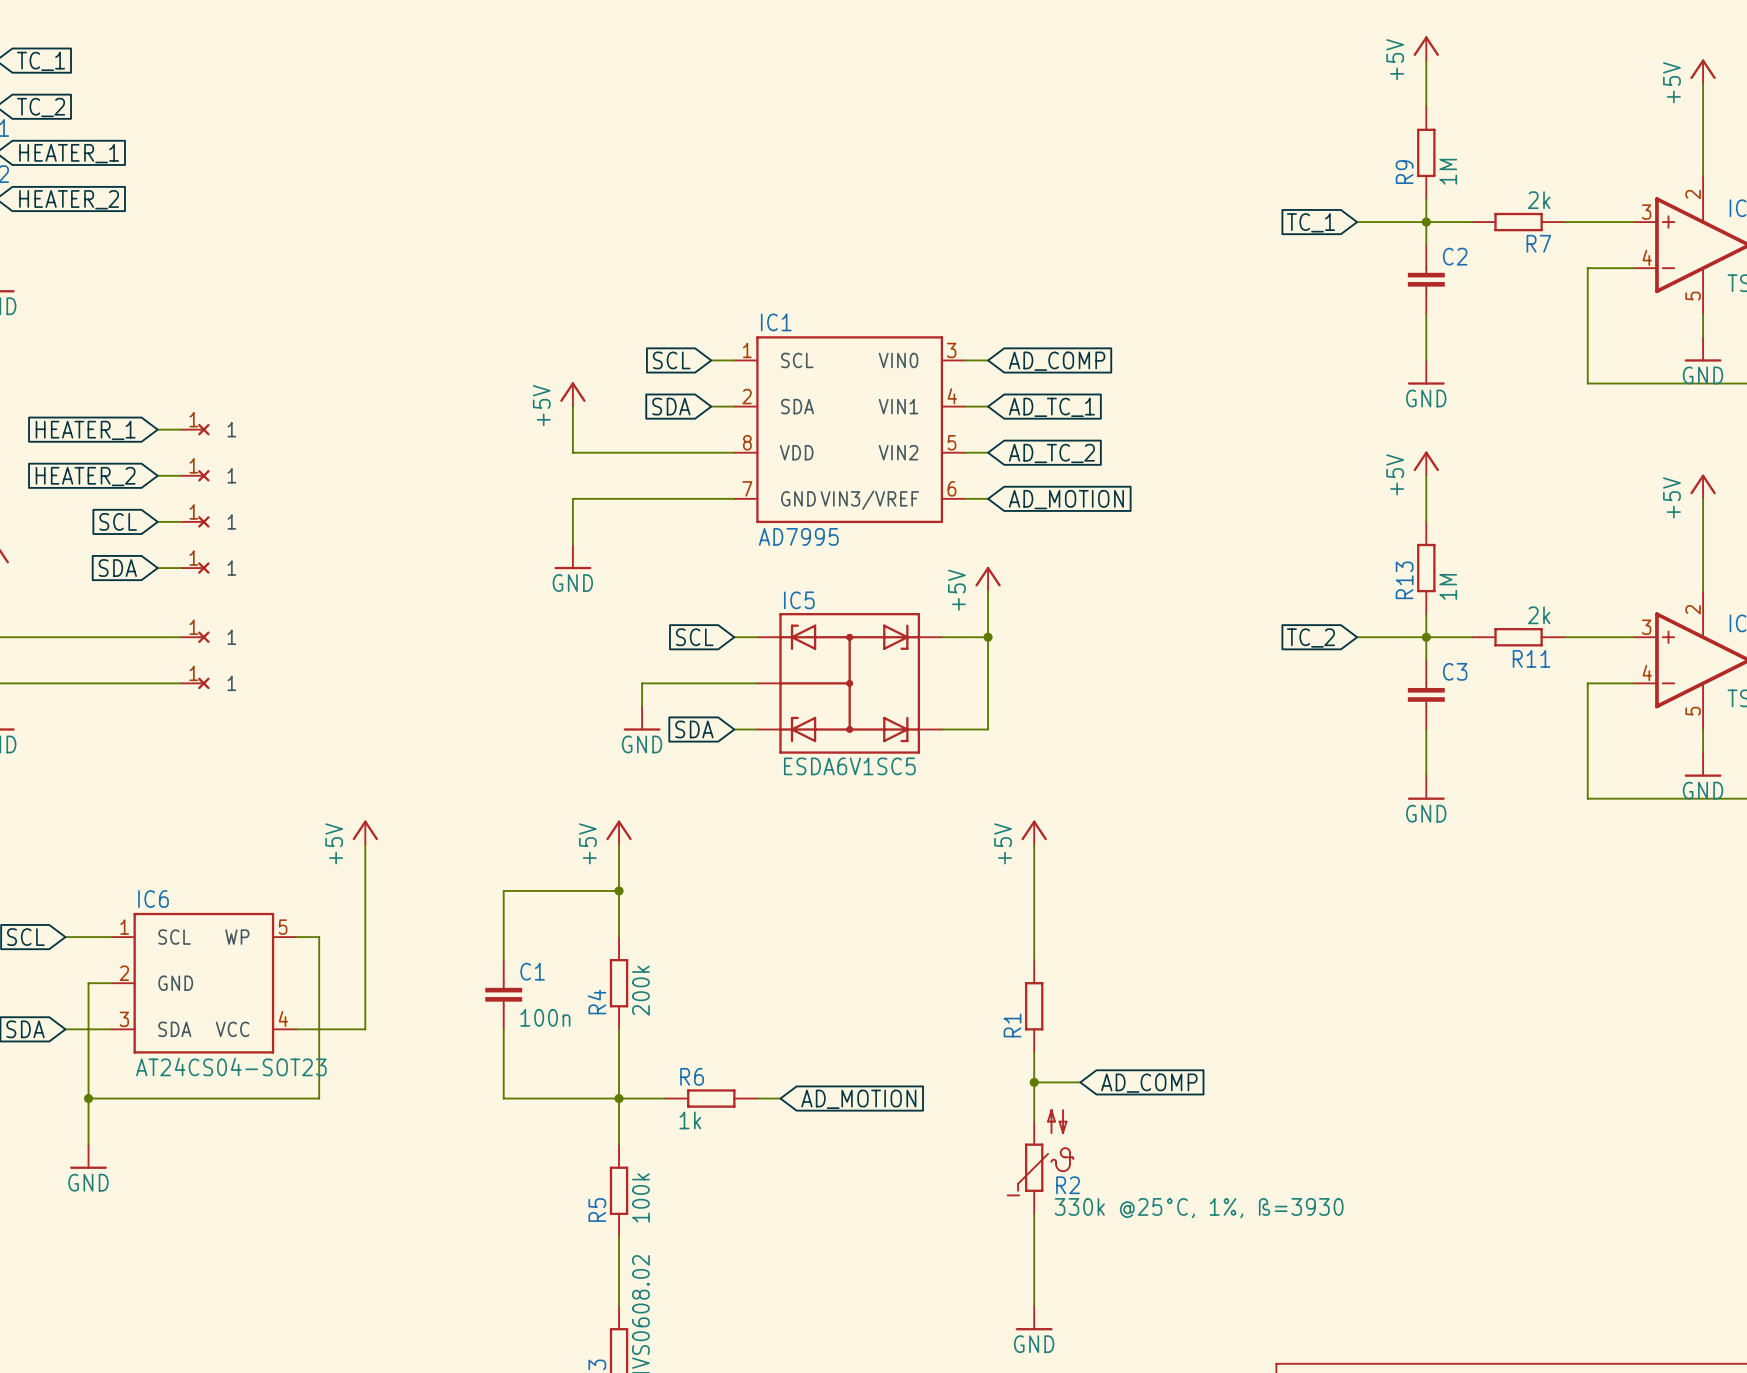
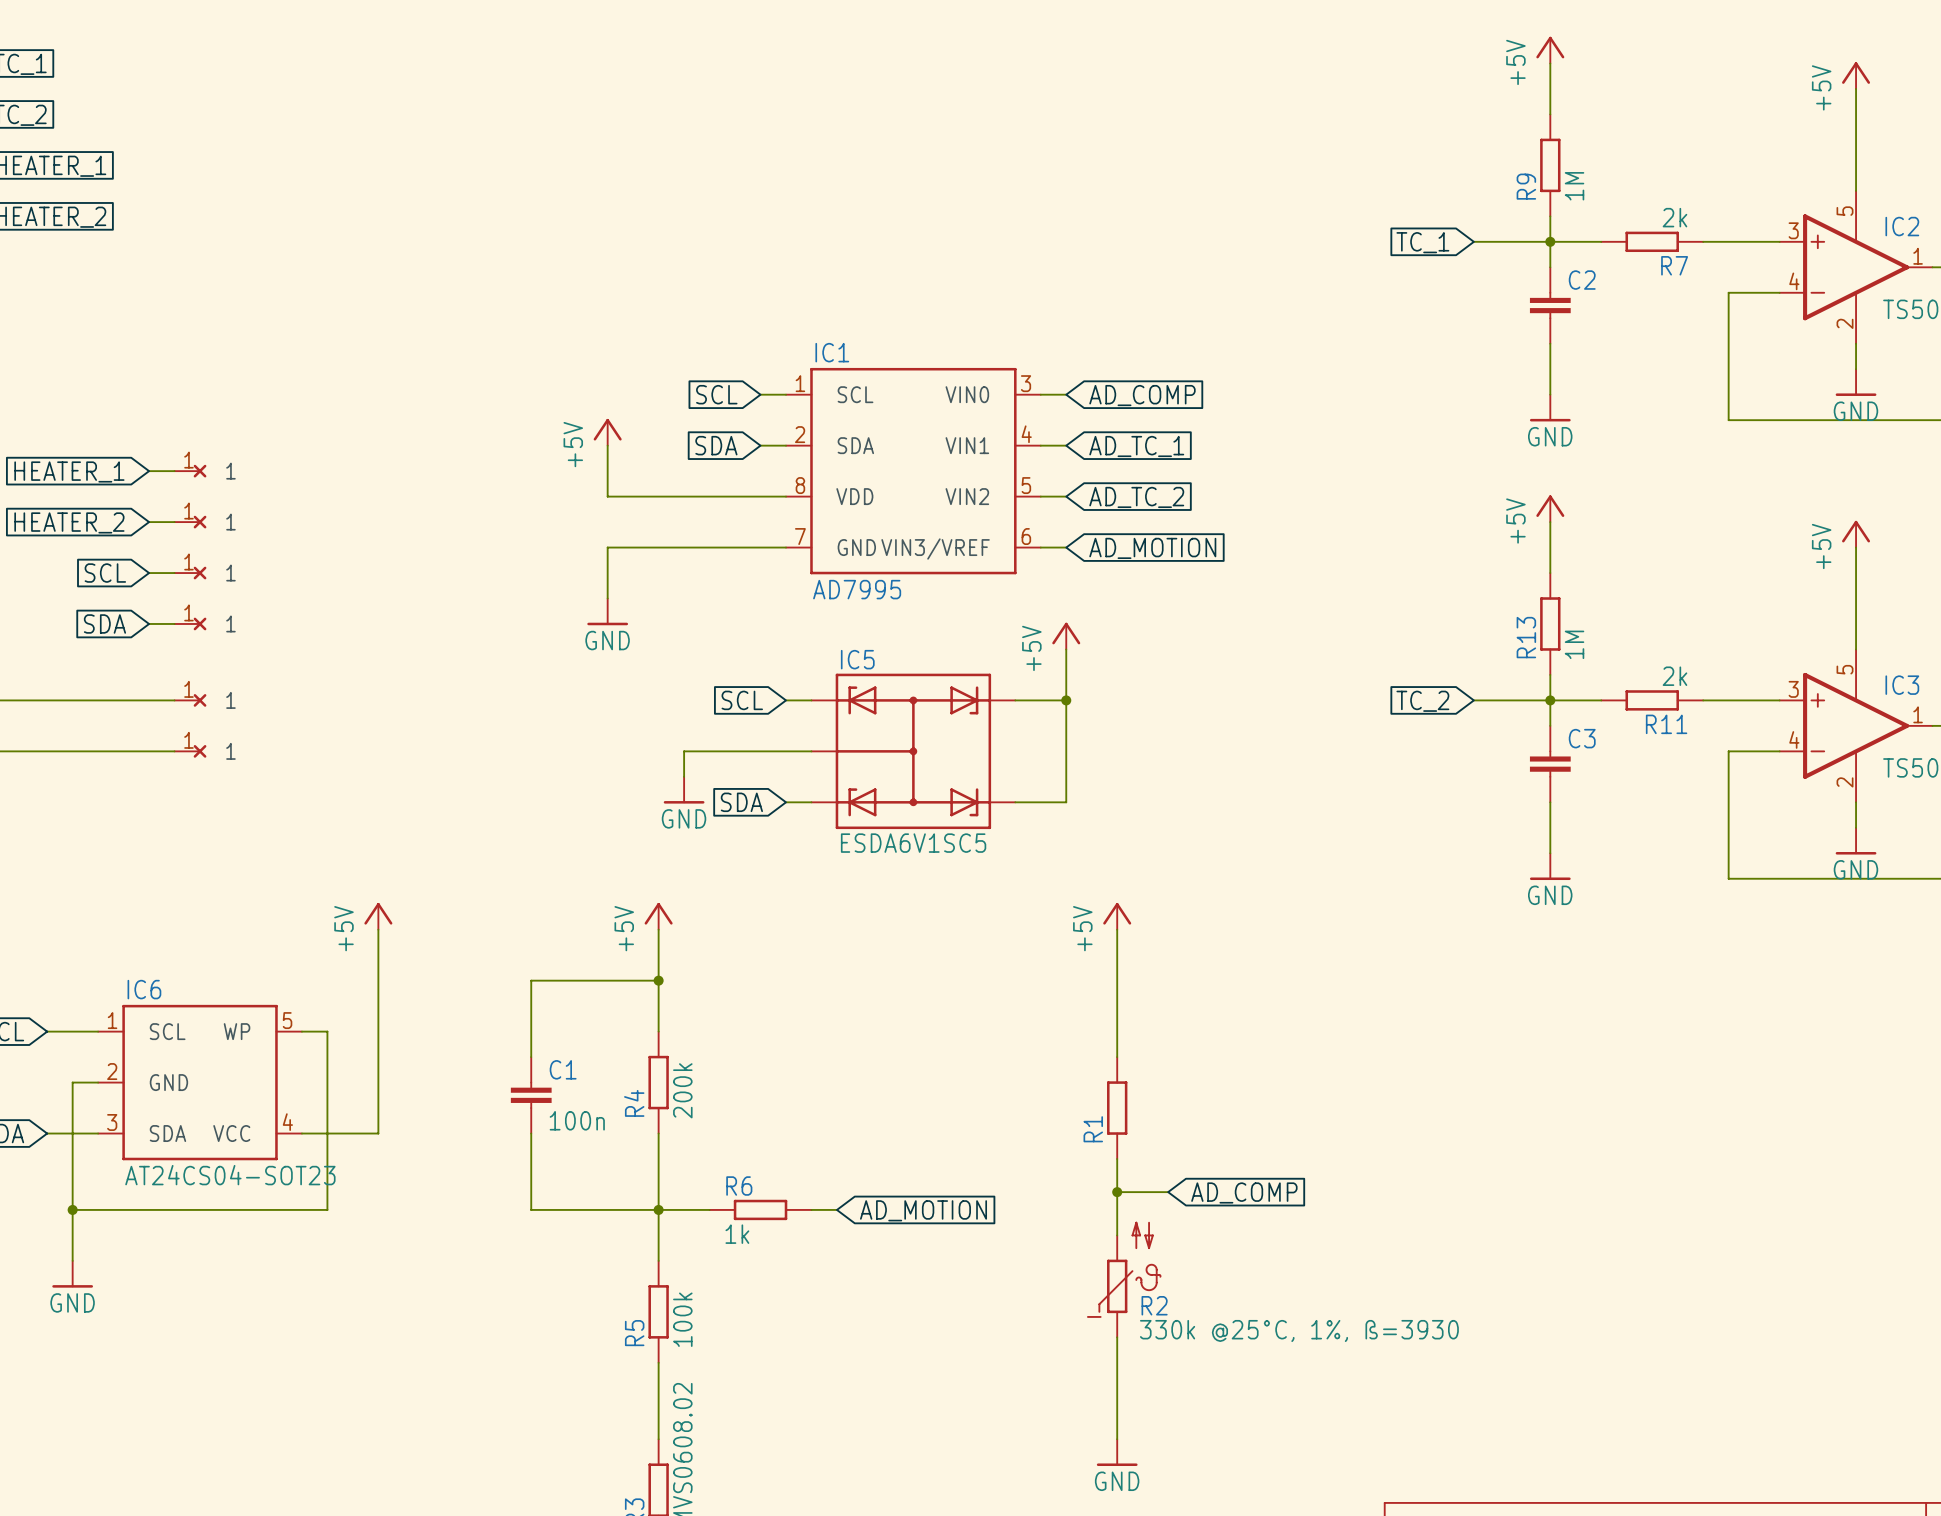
IC2 pin number: 2 (1693, 194) -> 5 (1845, 211)
IC2 pin number: 5 (1693, 296) -> 2 (1845, 323)
IC3 pin number: 2 (1693, 609) -> 5 (1845, 669)
IC3 pin number: 5 (1693, 711) -> 2 (1845, 782)

